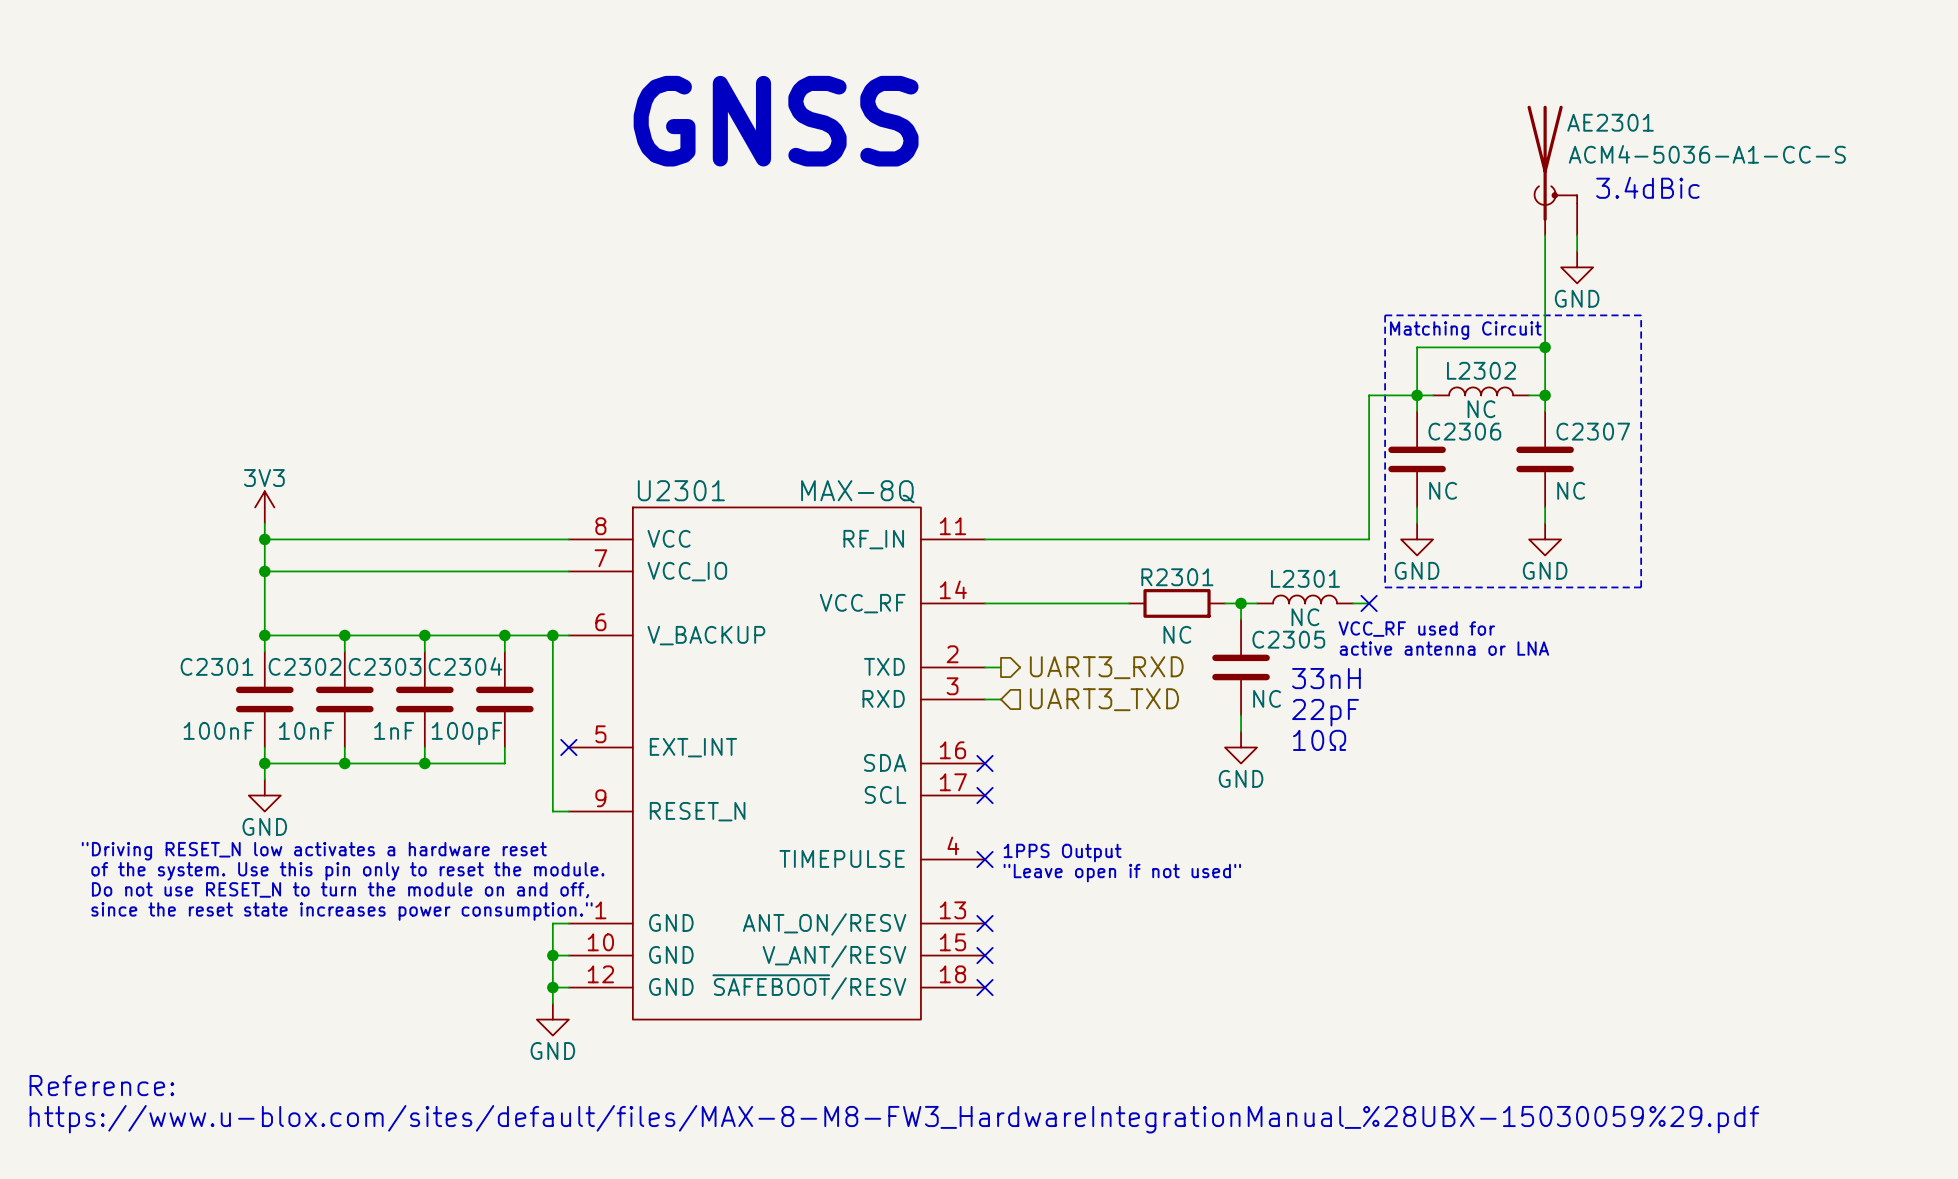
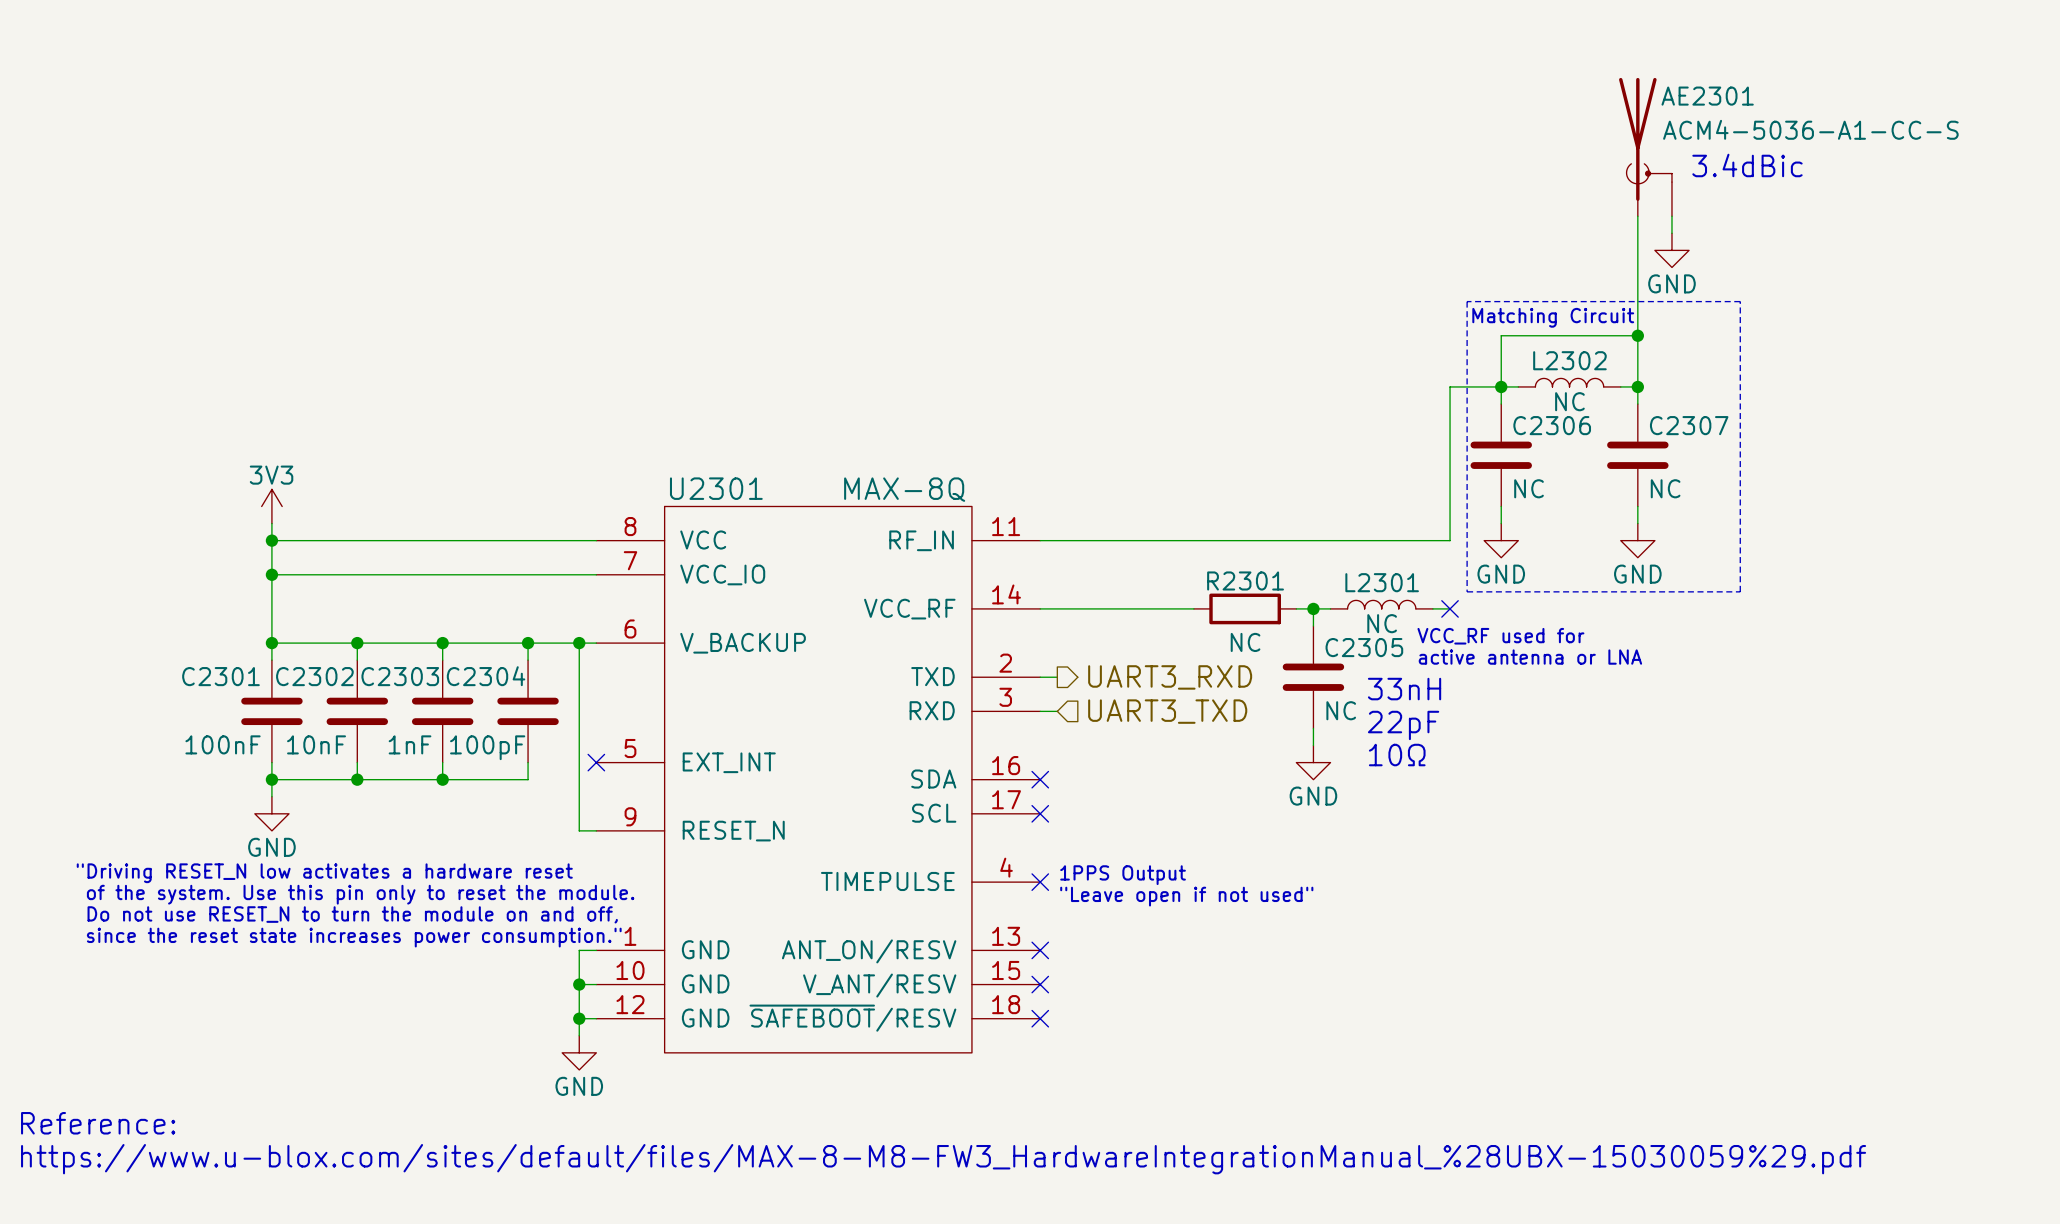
text: GNSS (776, 121) -> none

